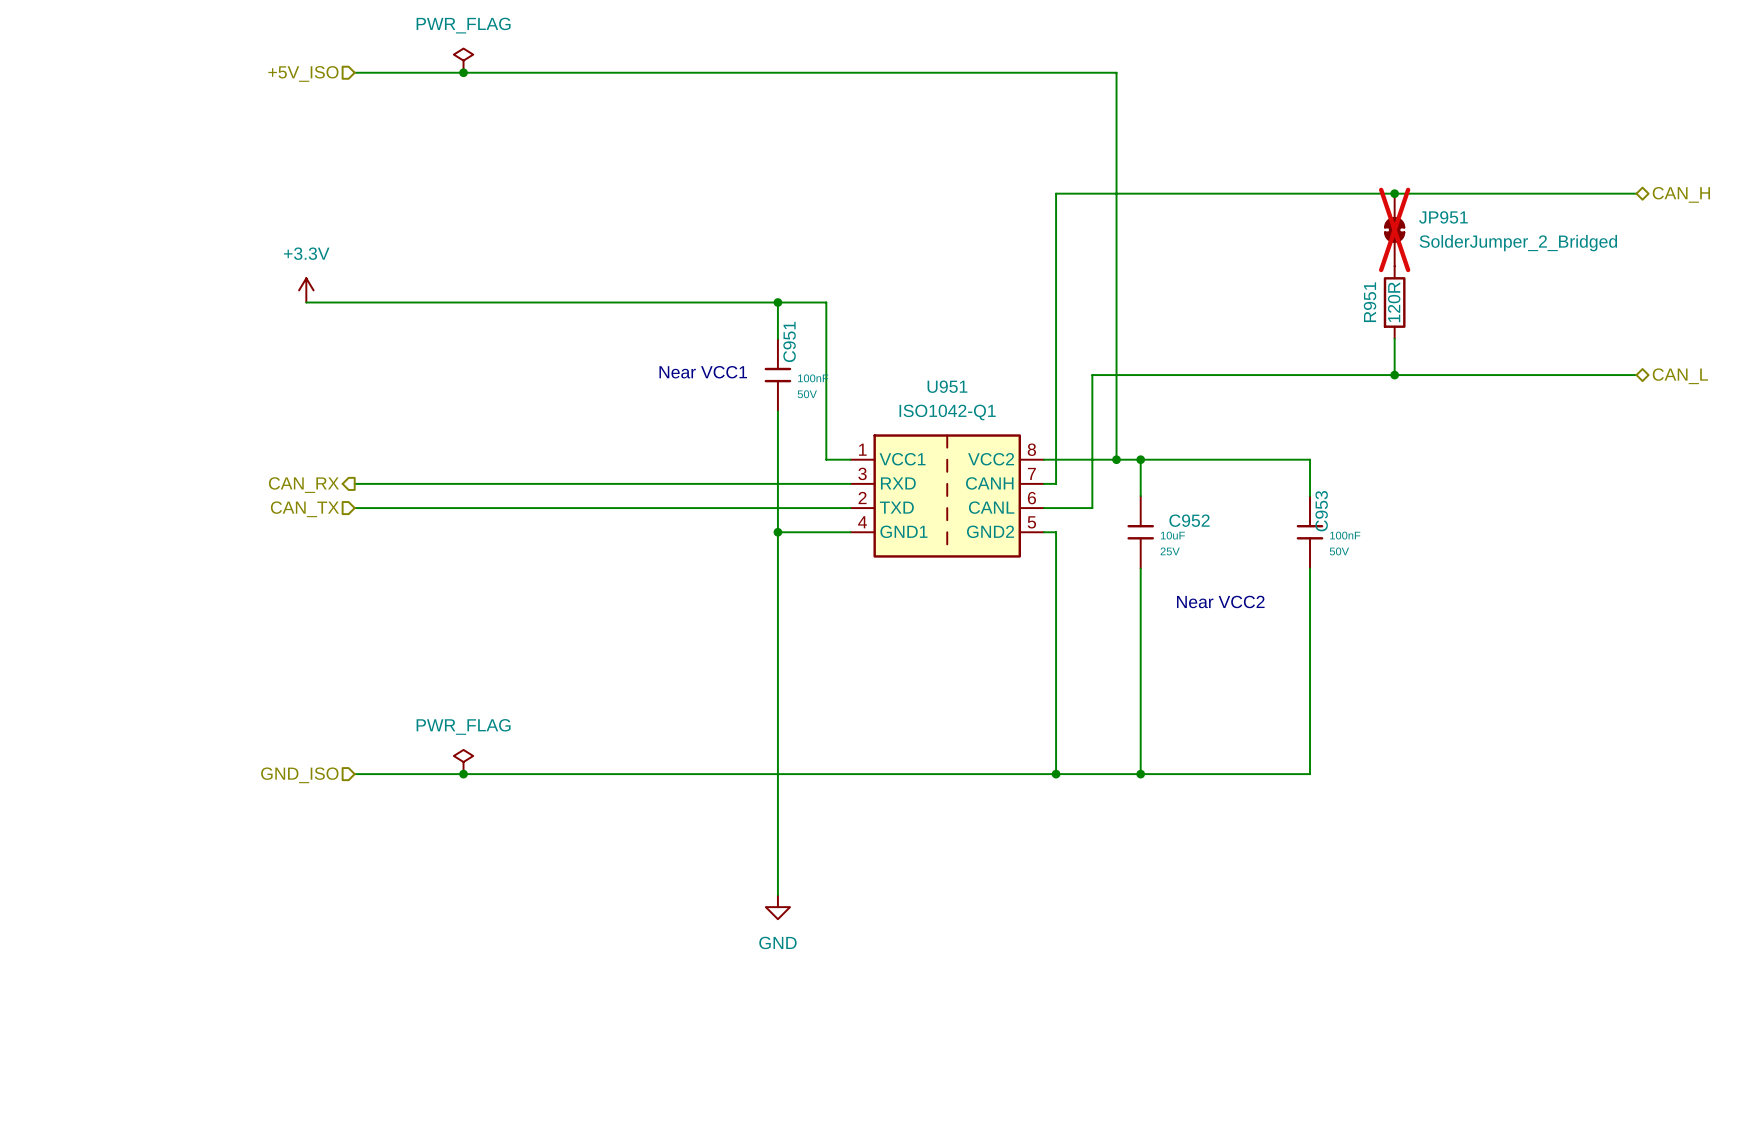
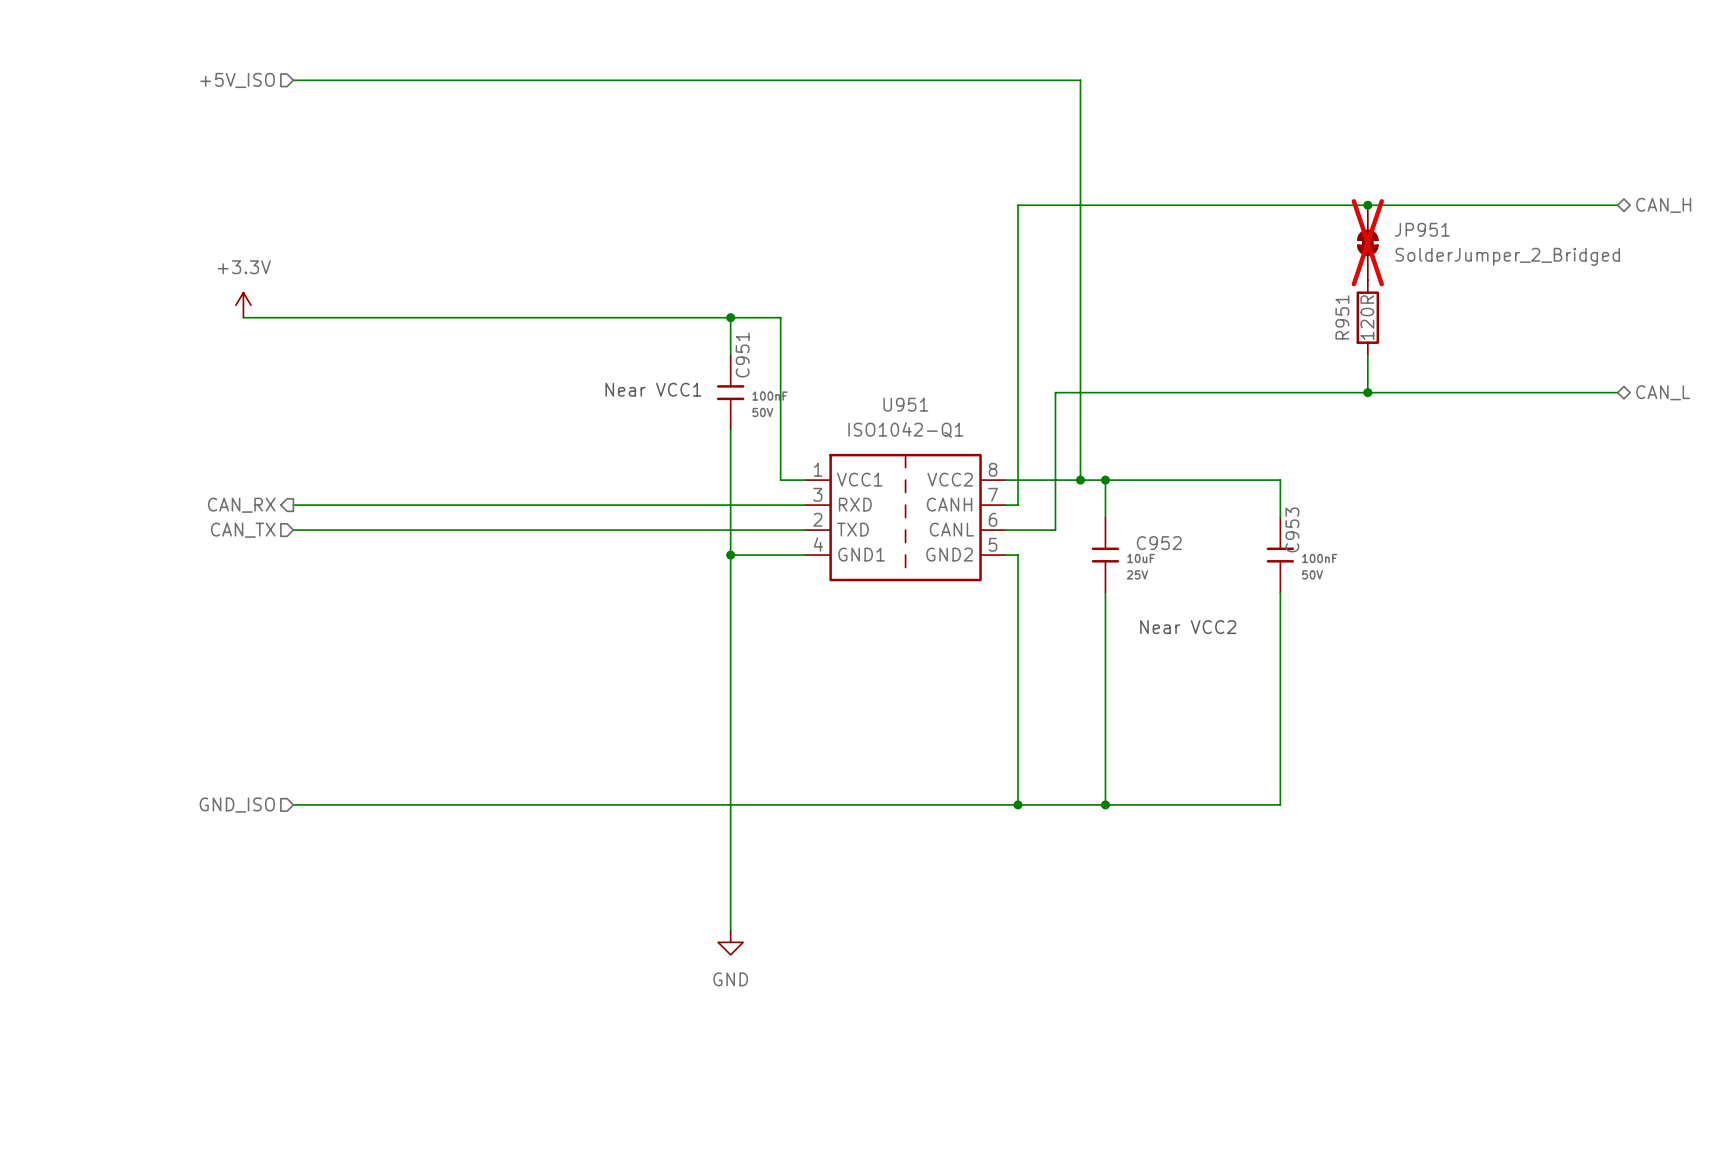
power symbol: PWR_FLAG (463, 60) -> none
junction: (463, 72) -> none
power symbol: PWR_FLAG (463, 762) -> none
junction: (463, 774) -> none

